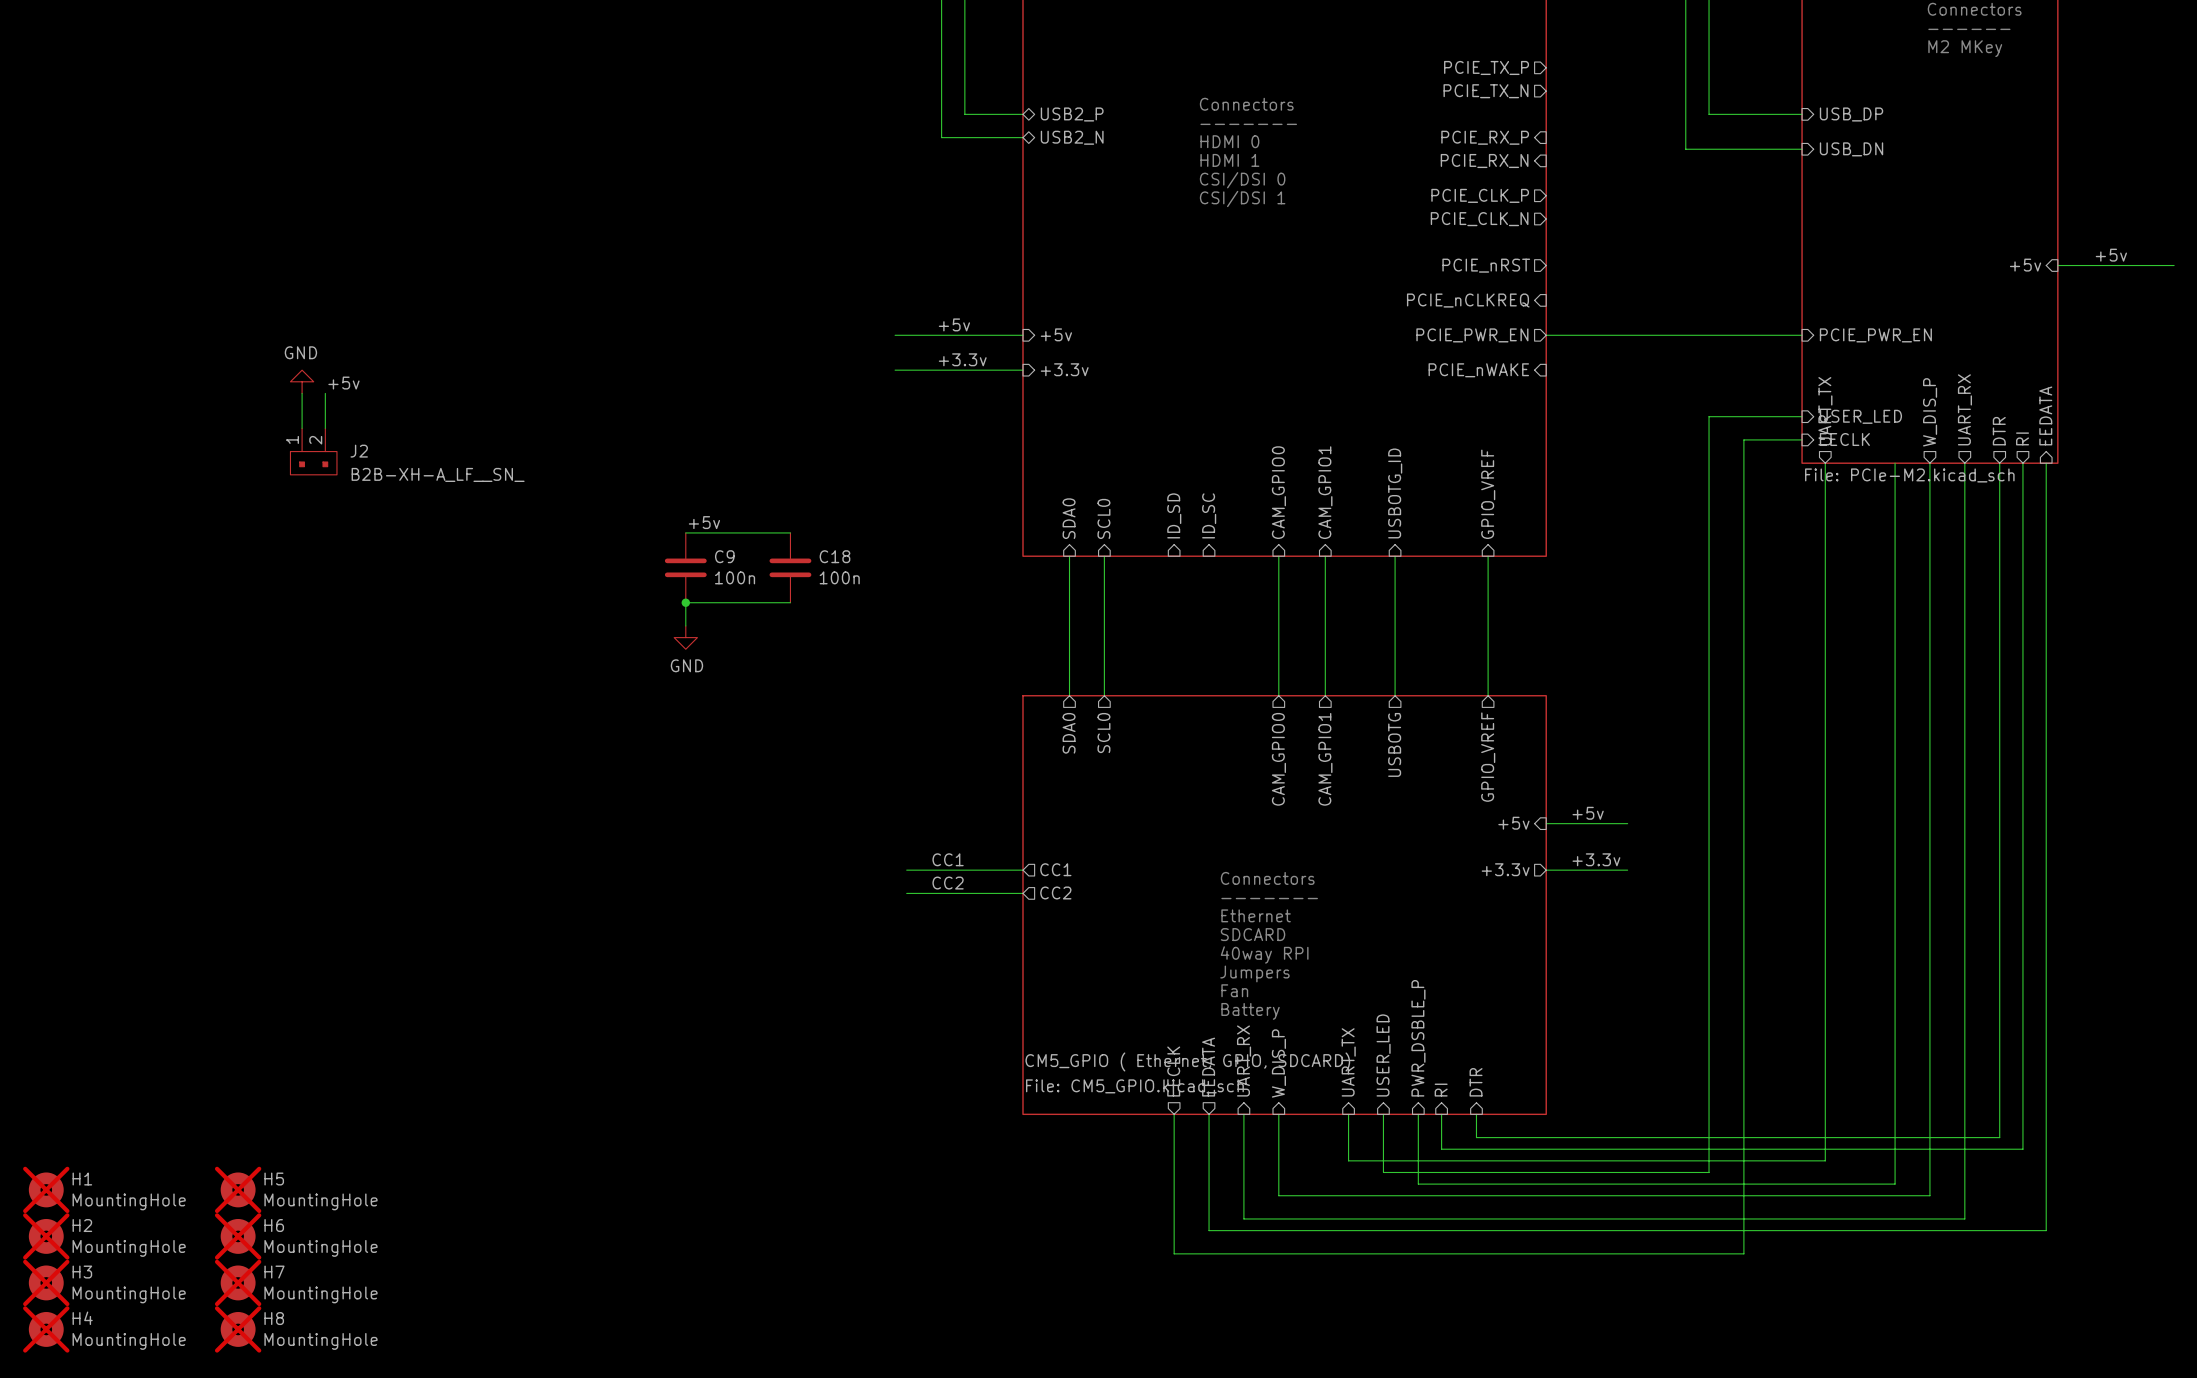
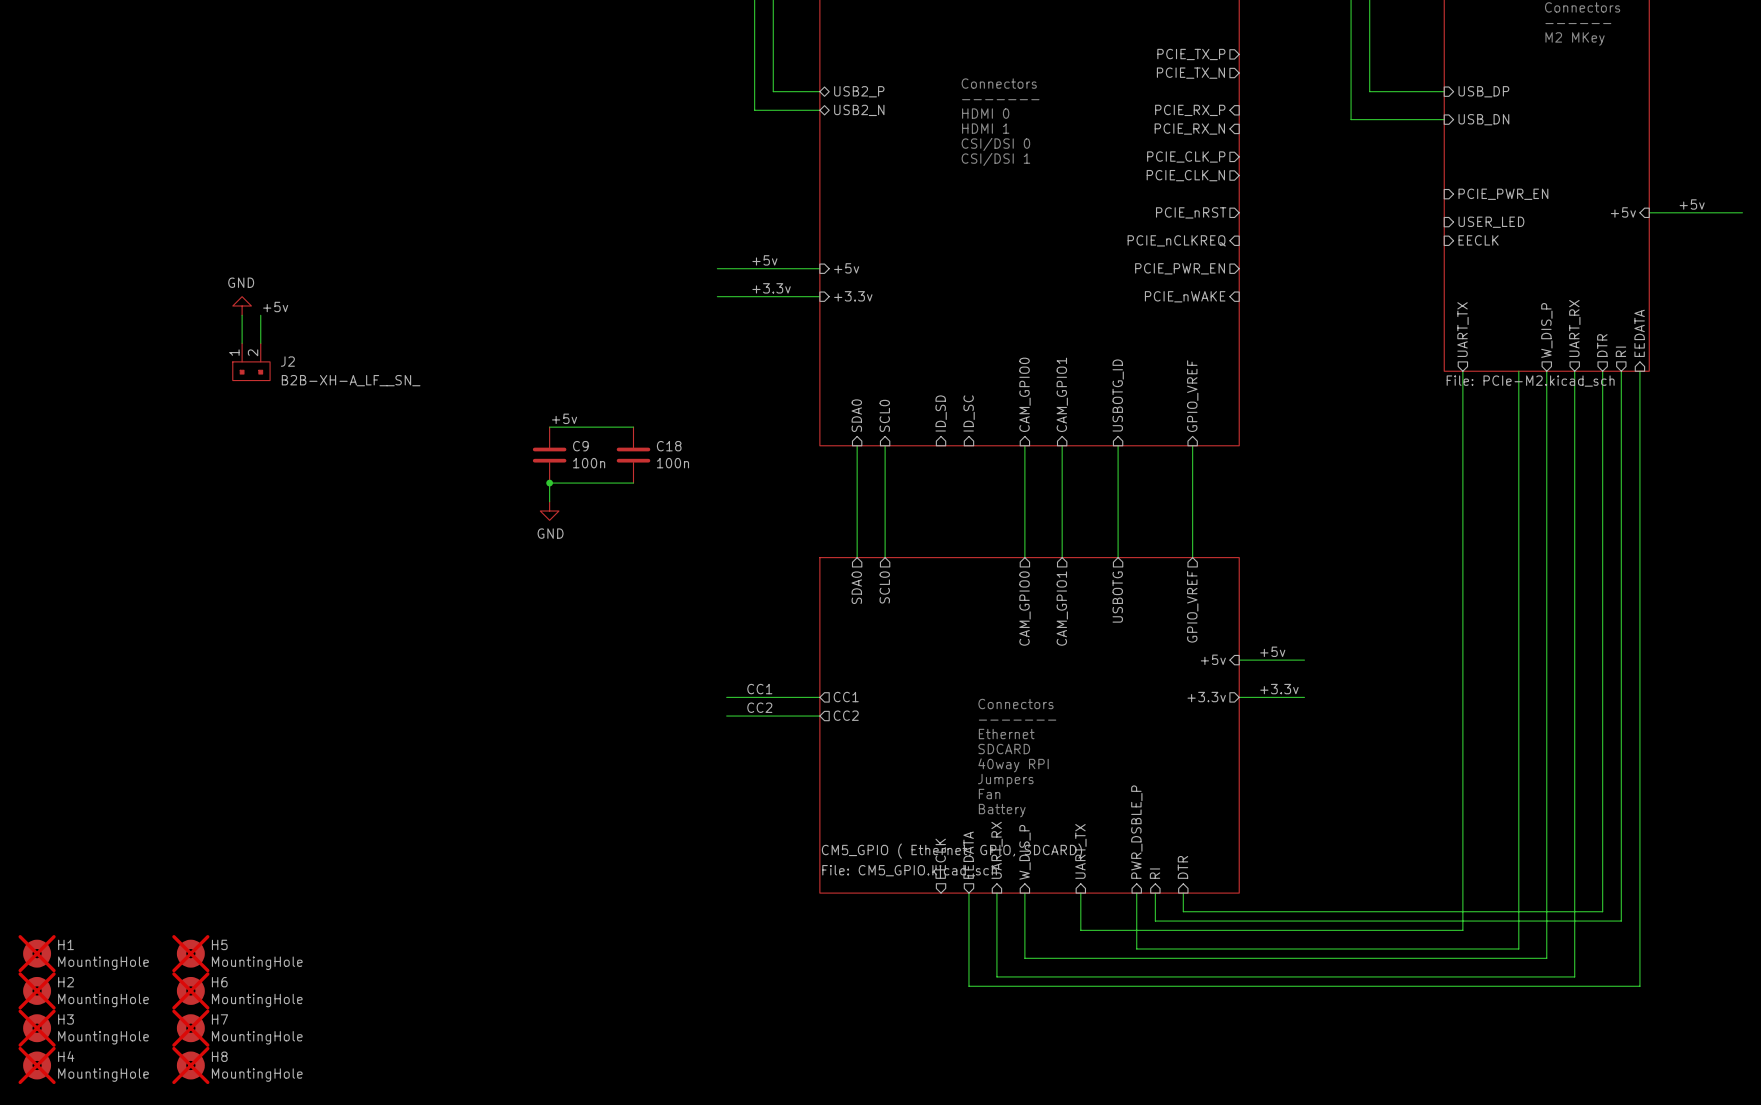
wire: (1546, 335) (1802, 335) -> none
sheet pin position: PCIE_PWR_EN (1875, 335) -> PCIE_PWR_EN (1503, 194)
wire: (1802, 416) (1709, 416) (1709, 1172) (1383, 1172) (1383, 1114) -> none
sheet pin position: USER_LED (1860, 416) -> USER_LED (1491, 222)
wire: (1802, 439) (1743, 439) (1743, 1253) (1174, 1253) (1174, 1114) -> none
sheet pin position: EECLK (1844, 439) -> EECLK (1478, 240)
sheet pin: USER_LED (1383, 1055) -> none

